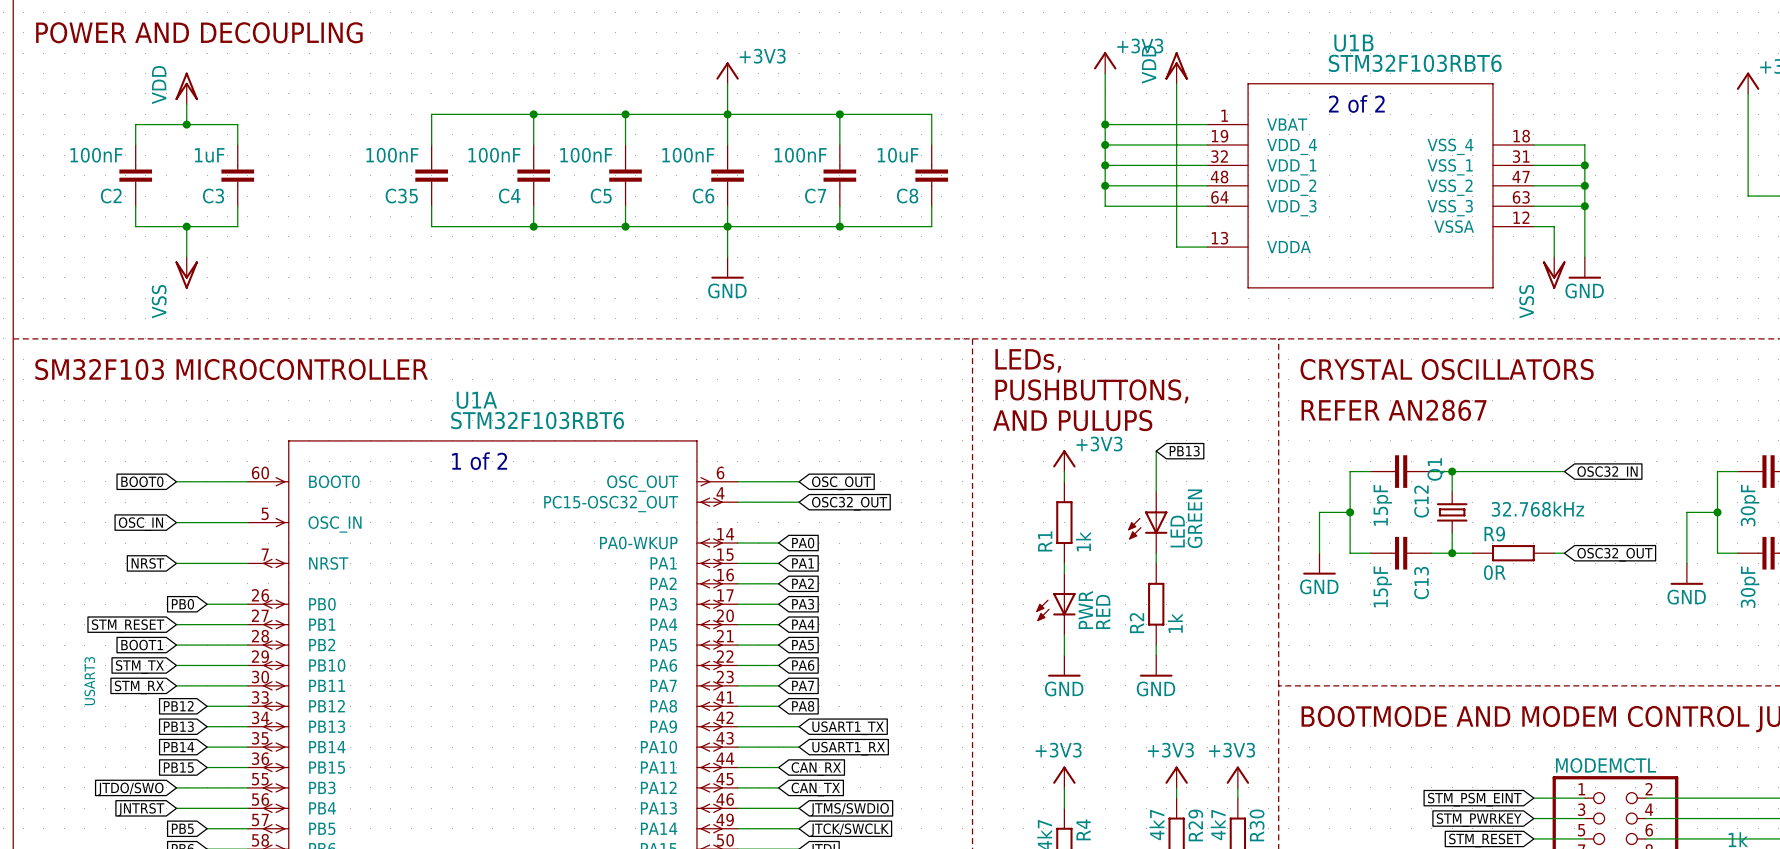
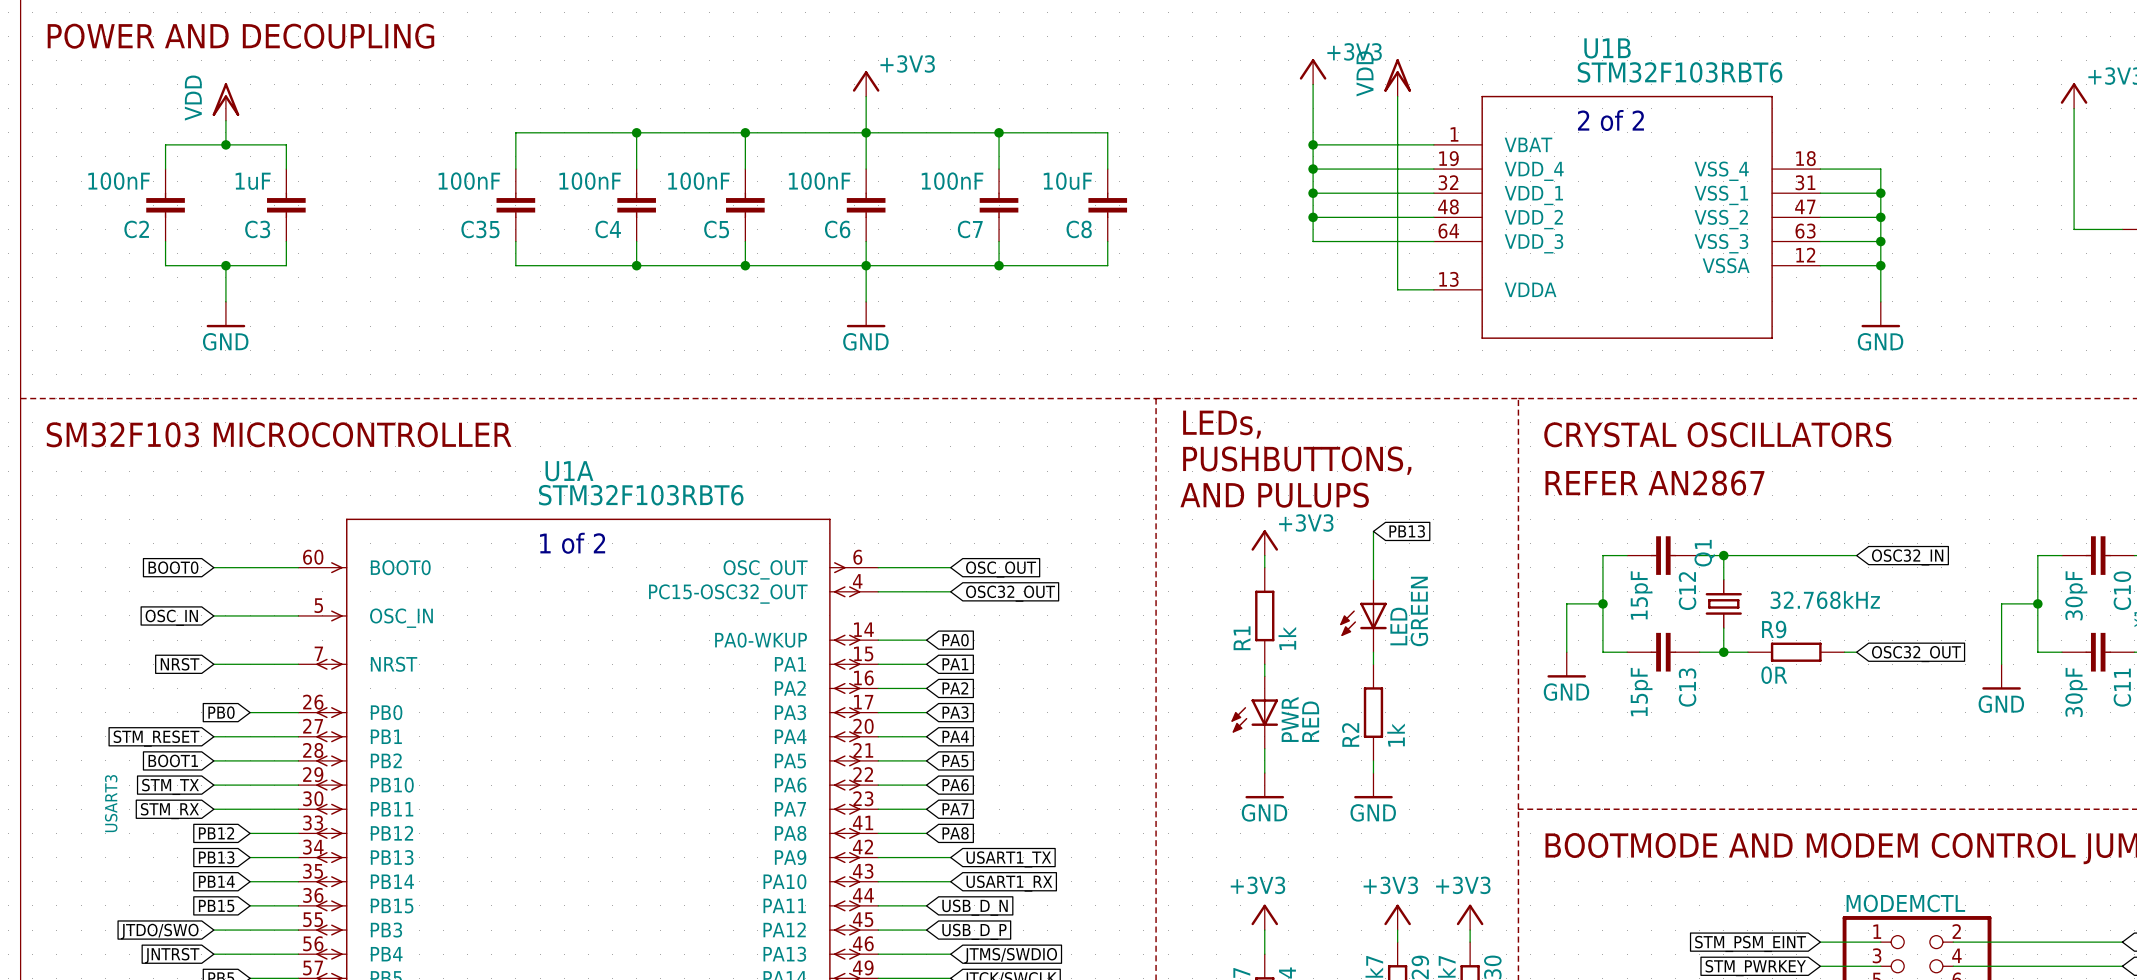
wire: (1554, 226) (1554, 257) -> (1844, 265) (1880, 265)
junction: none -> (1880, 265)
power symbol: VSS (186, 273) -> GND (225, 314)
power symbol: VSS (1554, 273) -> none
global label: CAN_RX (816, 769) -> USB_D_N (975, 907)
global label: CAN_TX (815, 789) -> USB_D_P (974, 931)

